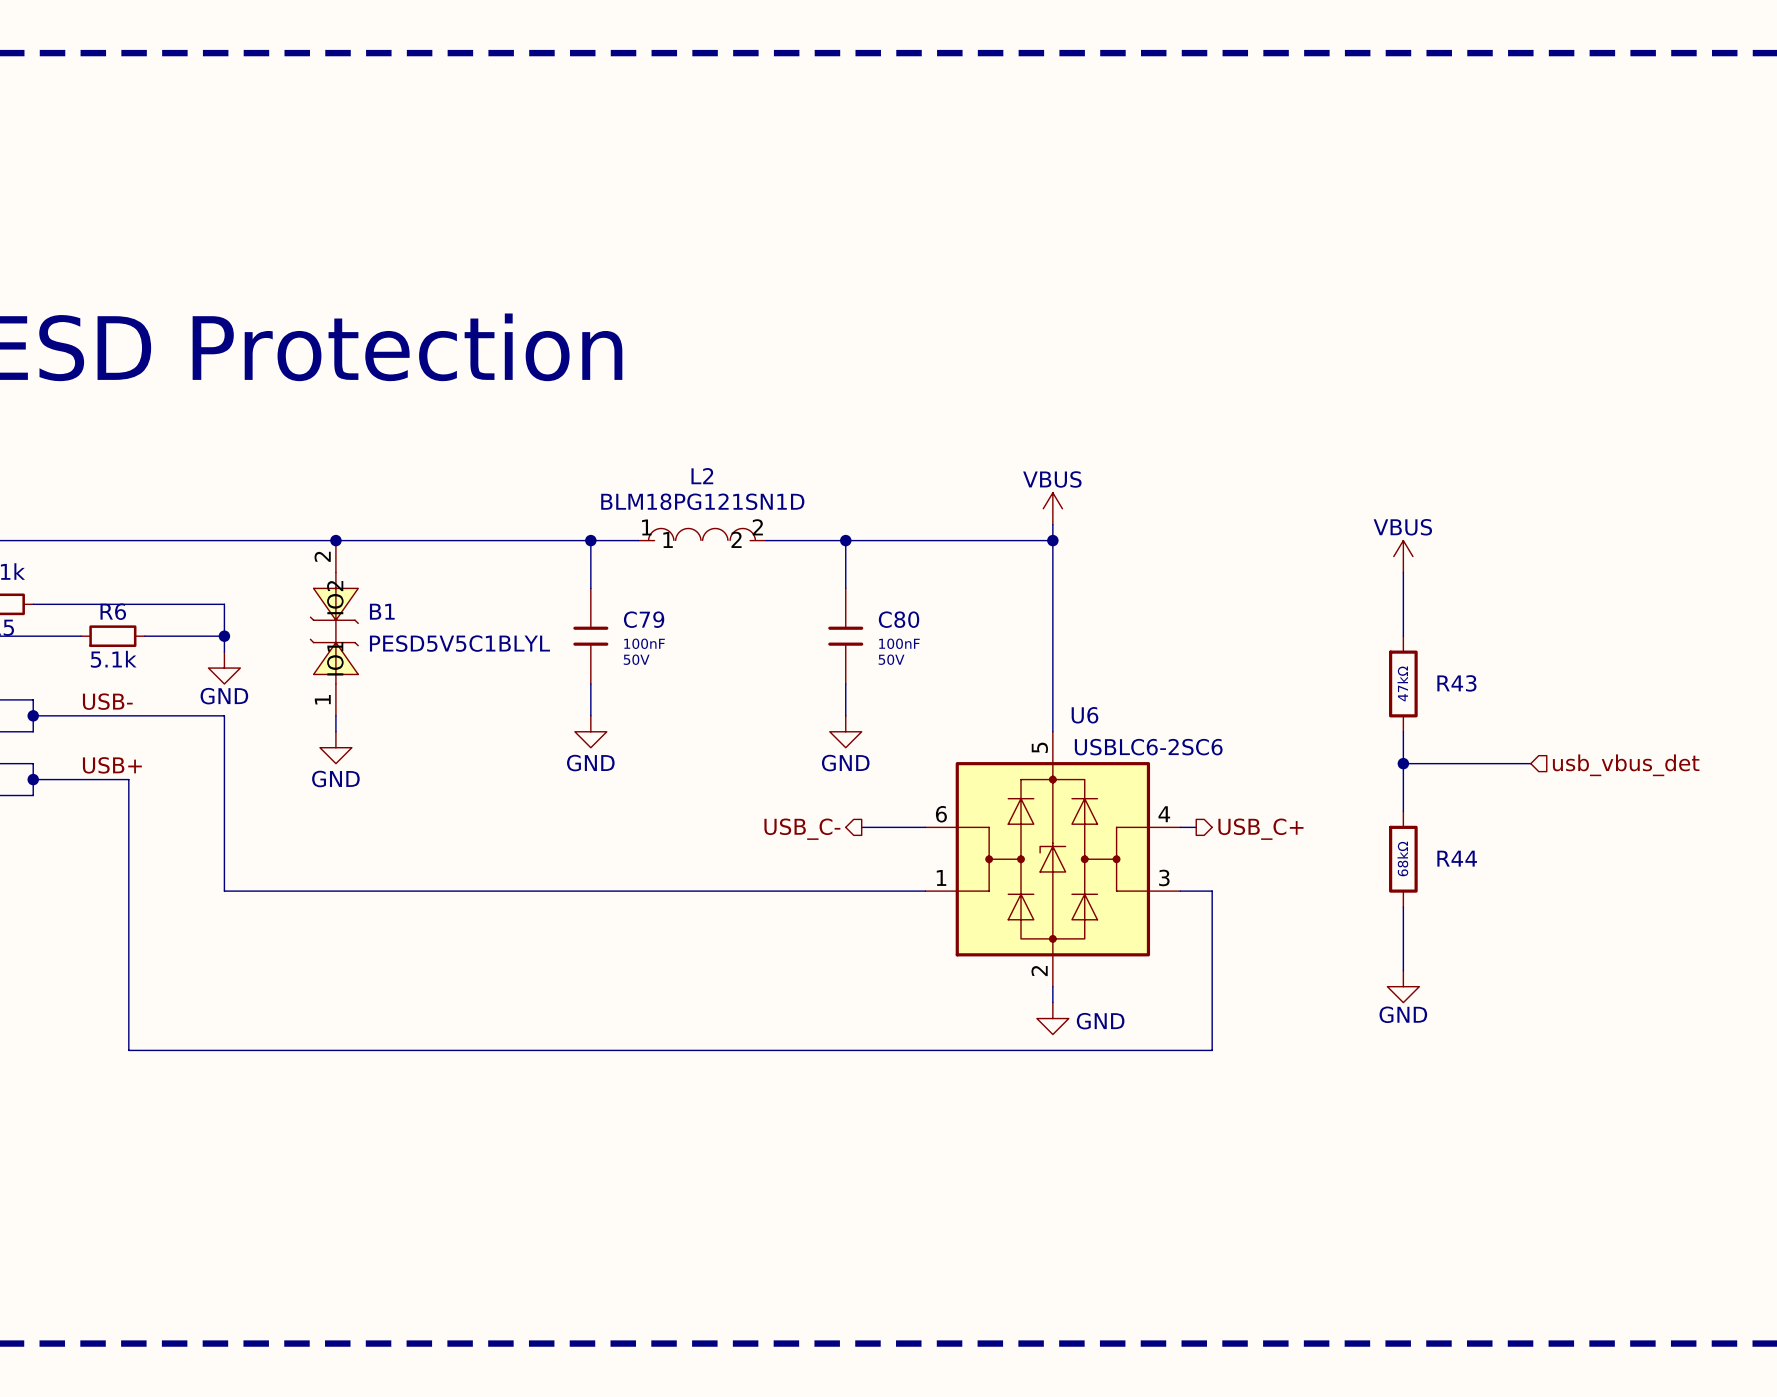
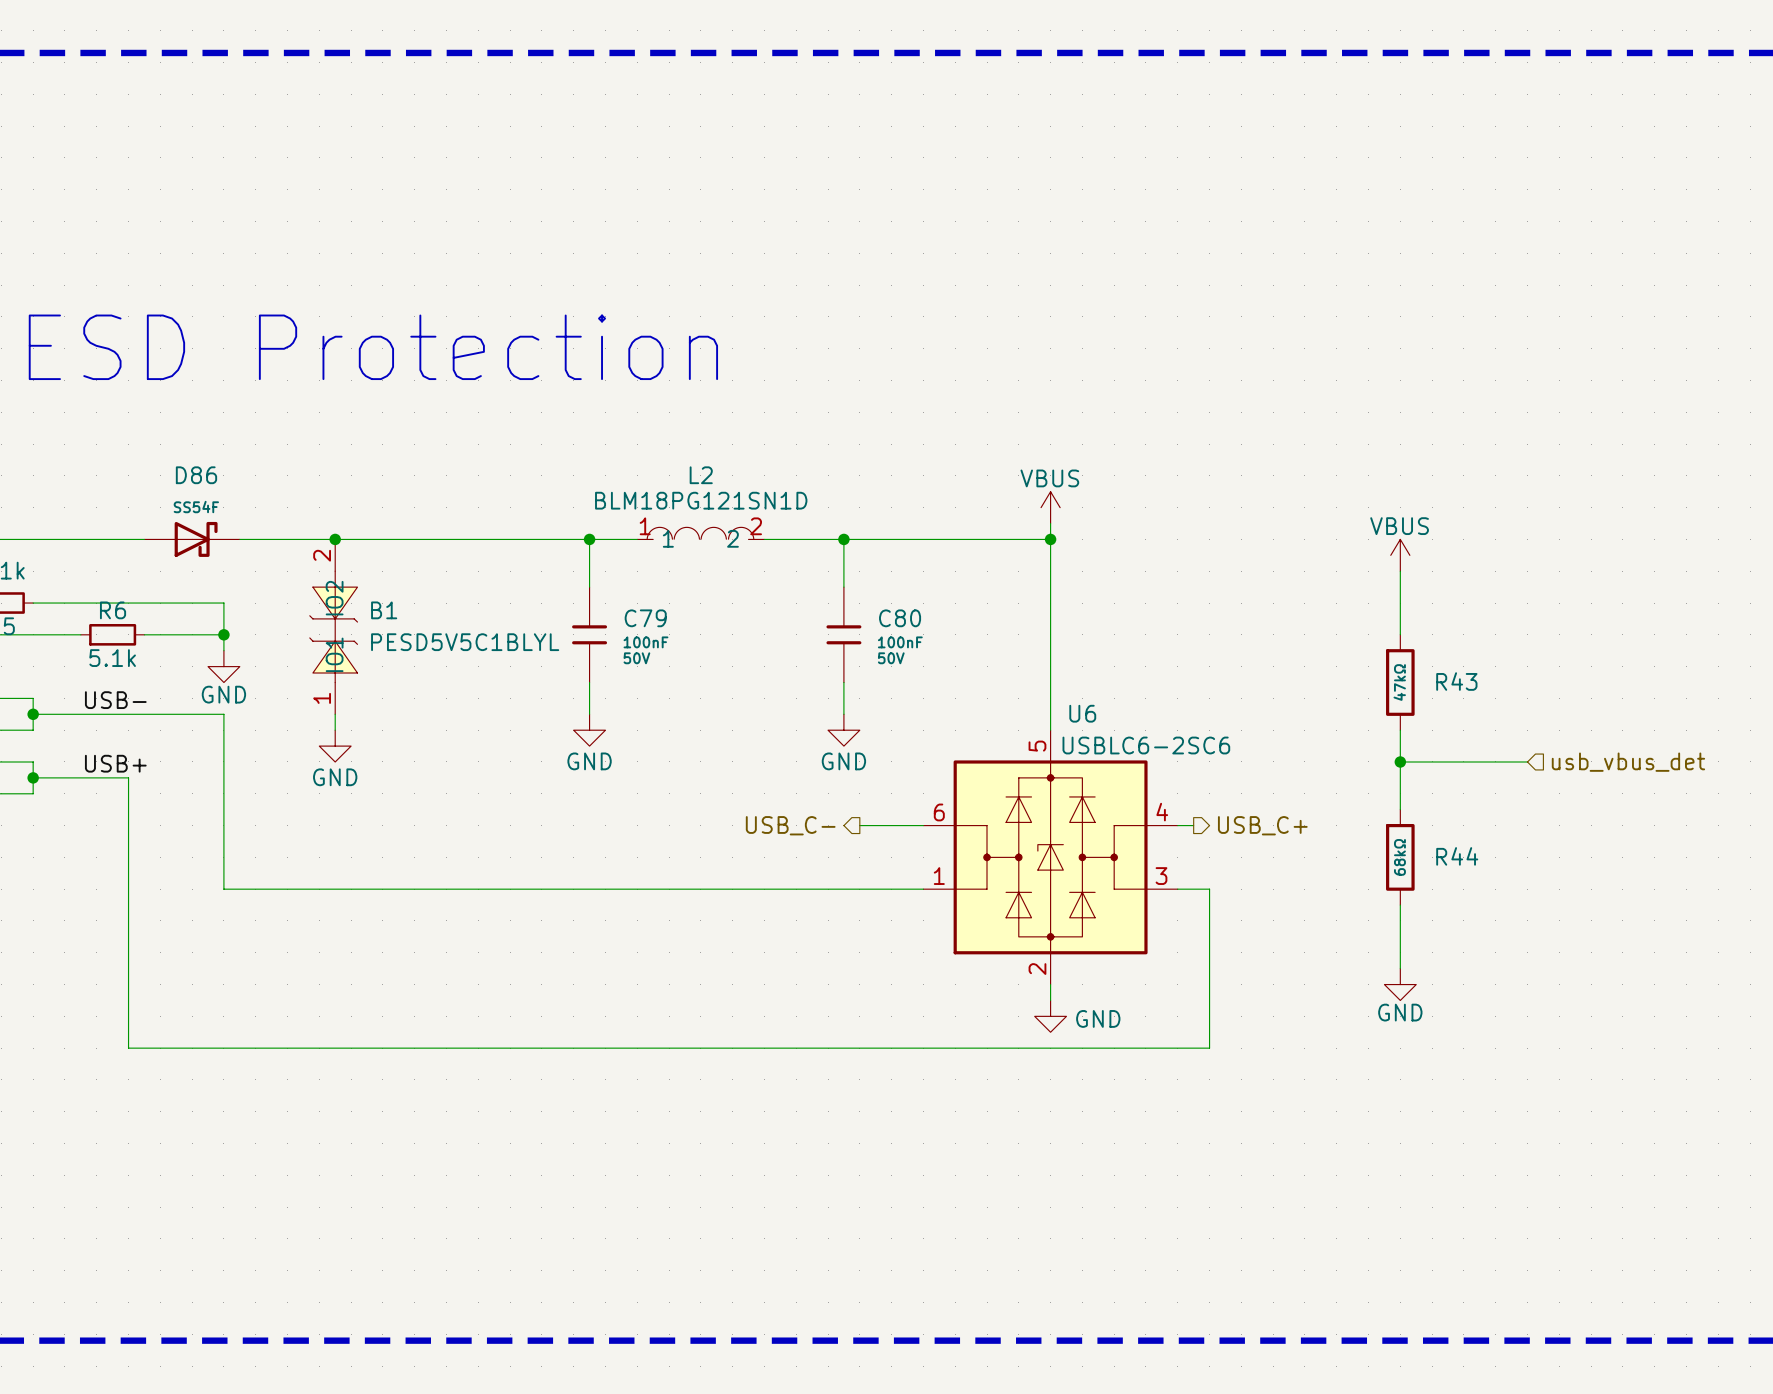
D86: none -> SS54F (192, 539)

